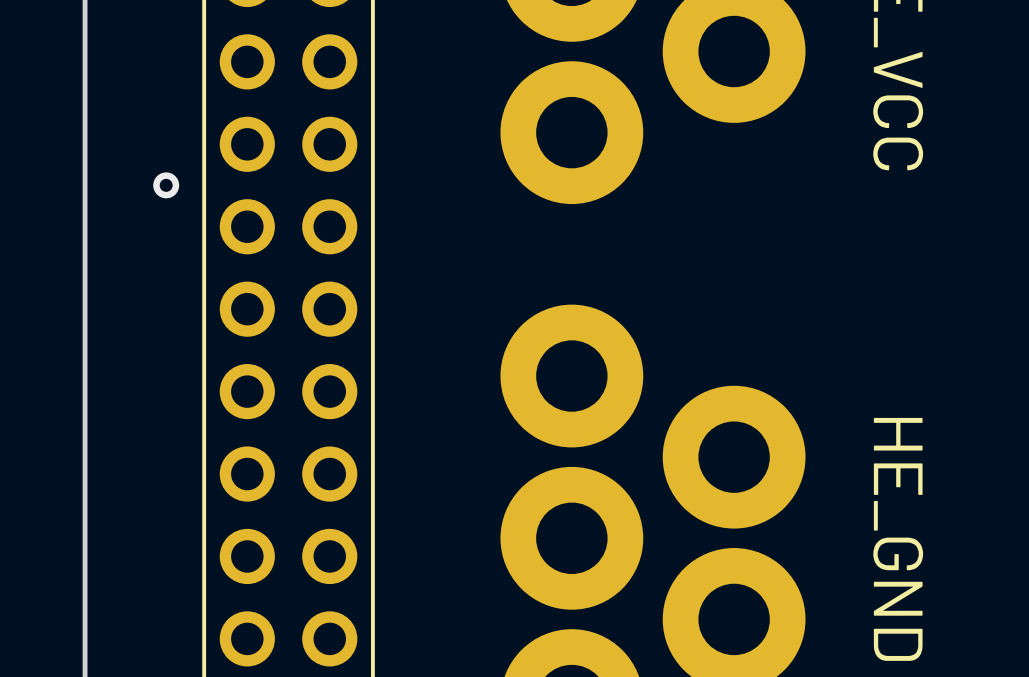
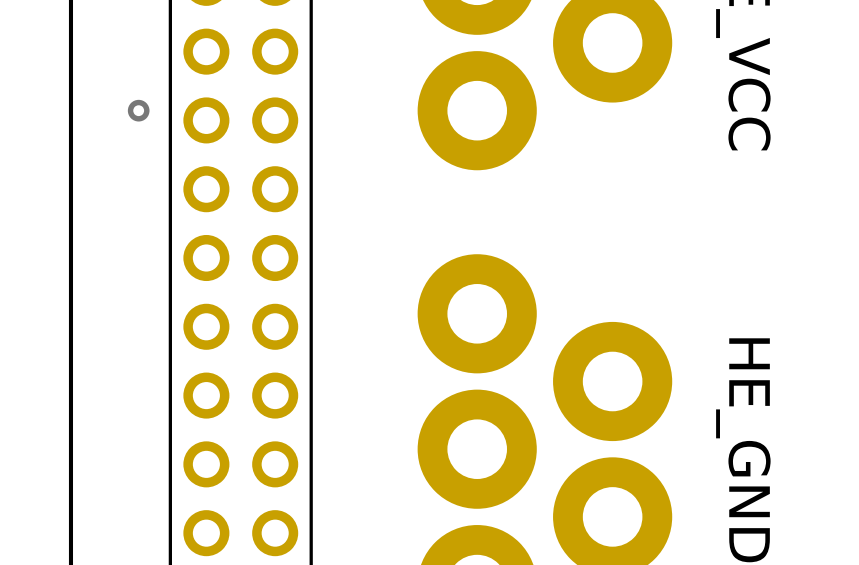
via position: (166, 185) -> (138, 110)

